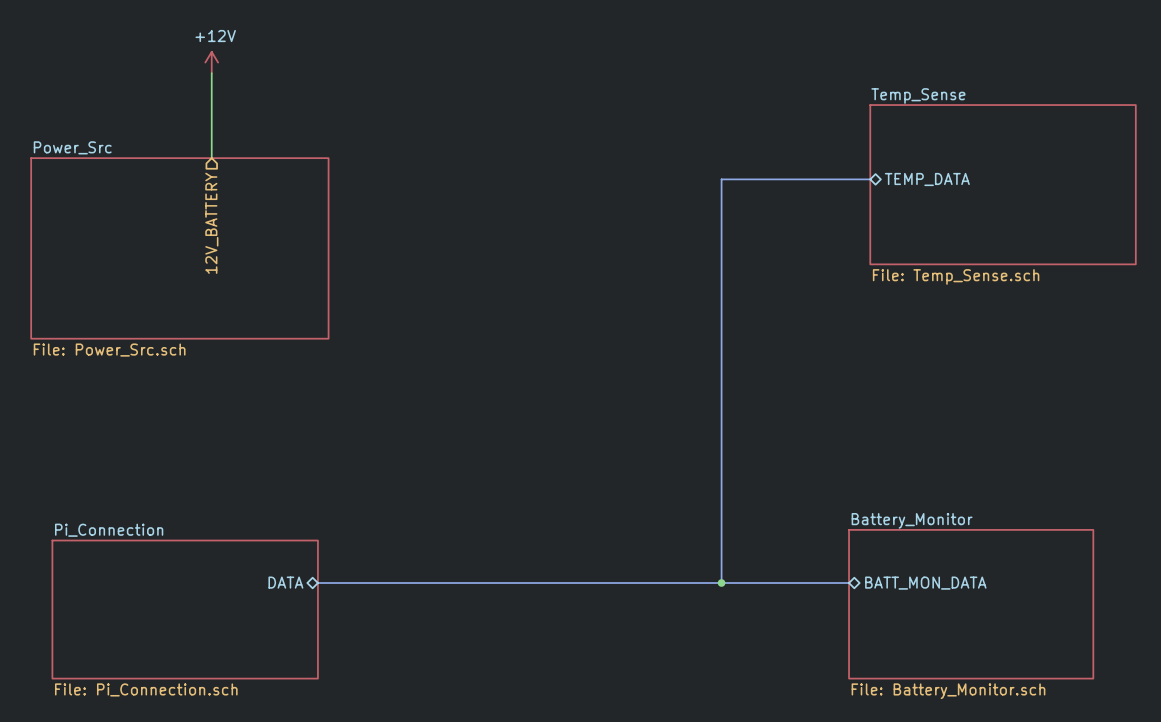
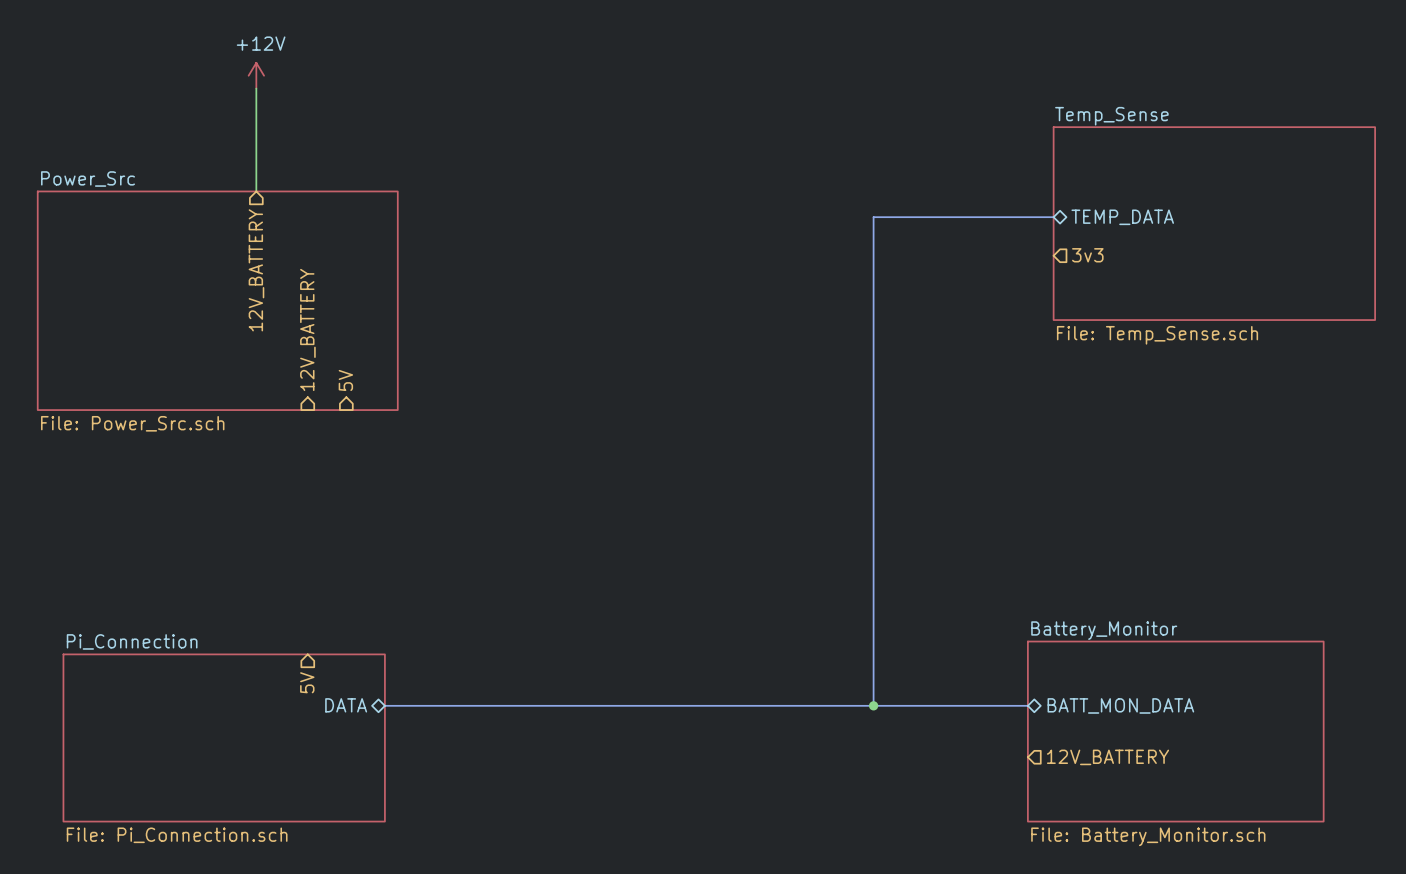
hierarchical label: none -> 3v3 (1087, 255)
hierarchical label: none -> 12V_BATTERY (307, 329)
hierarchical label: none -> 5V (345, 380)
hierarchical label: none -> 5V (307, 682)
hierarchical label: none -> 12V_BATTERY (1108, 757)

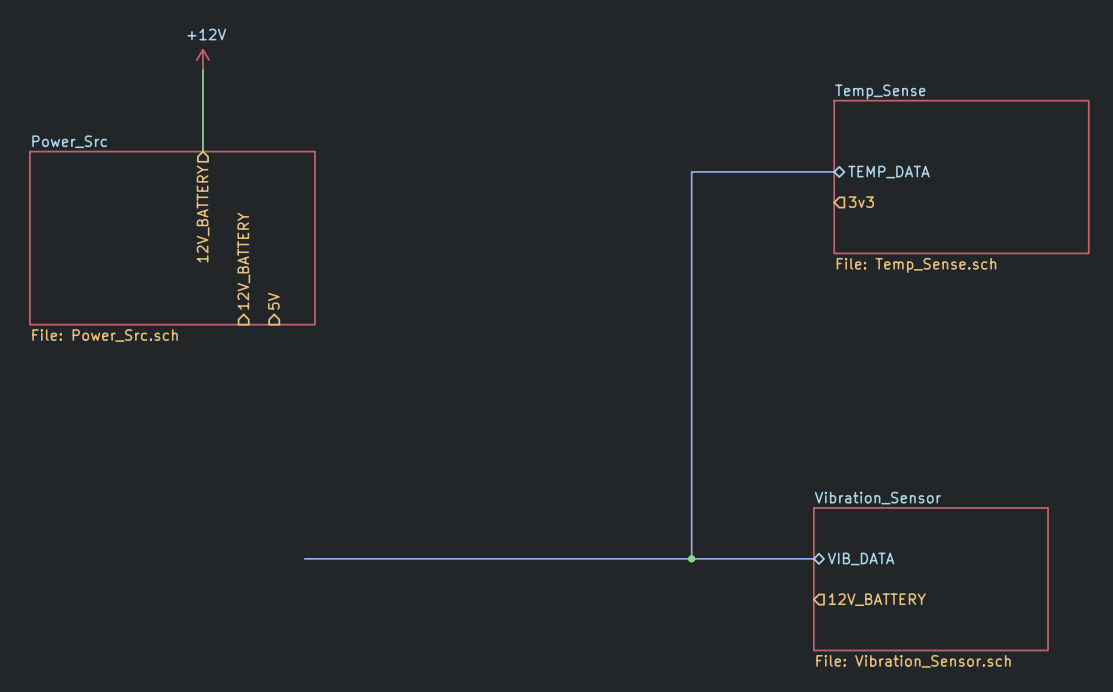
sheet Battery_Monitor name: Battery_Monitor (1104, 630) -> Vibration_Sensor (877, 498)
hierarchical label: 5V (307, 682) -> none
sheet pin: DATA (346, 705) -> none
sheet pin: BATT_MON_DATA (1120, 705) -> VIB_DATA (861, 558)
sheet Pi_Connection: File: Pi_Connection.sch (224, 737) -> none
sheet Battery_Monitor value: File: Battery_Monitor.sch (1148, 836) -> File: Vibration_Sensor.sch (913, 661)

